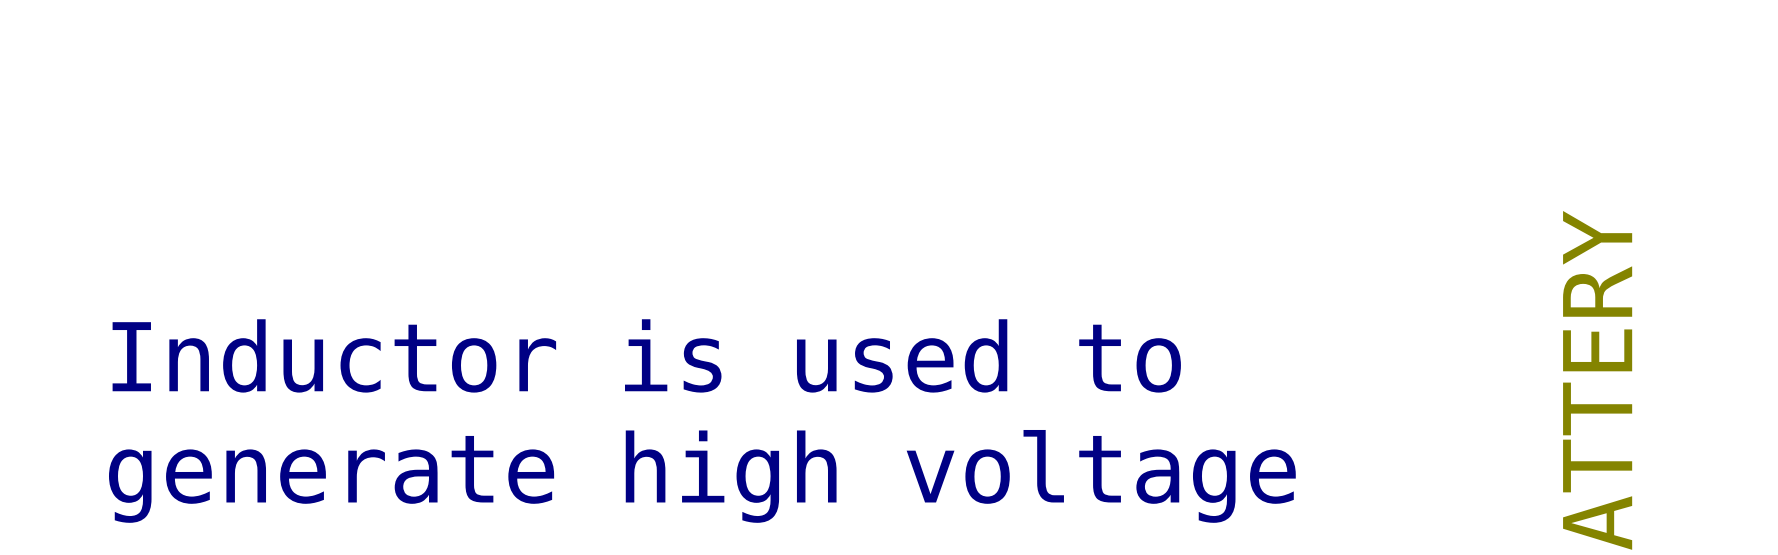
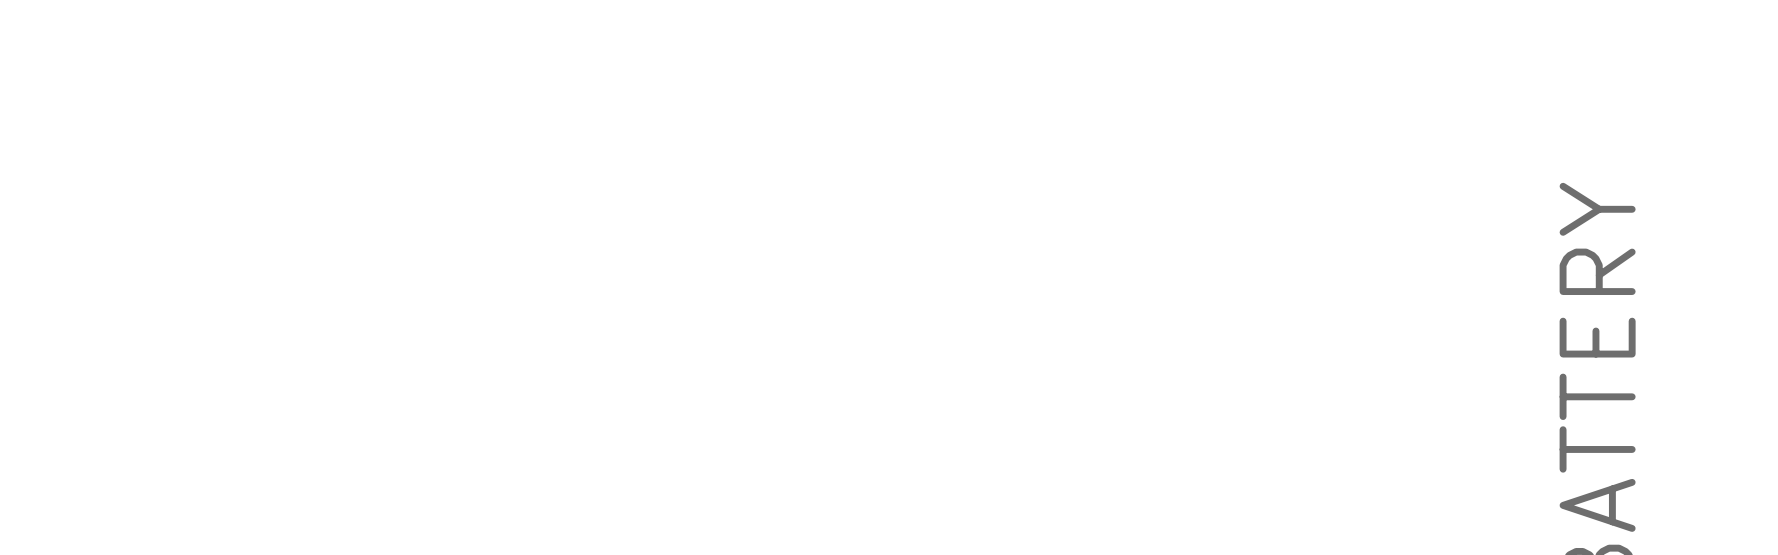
text: Inductor is used to (646, 355) -> none
text: generate high voltage (702, 476) -> none

